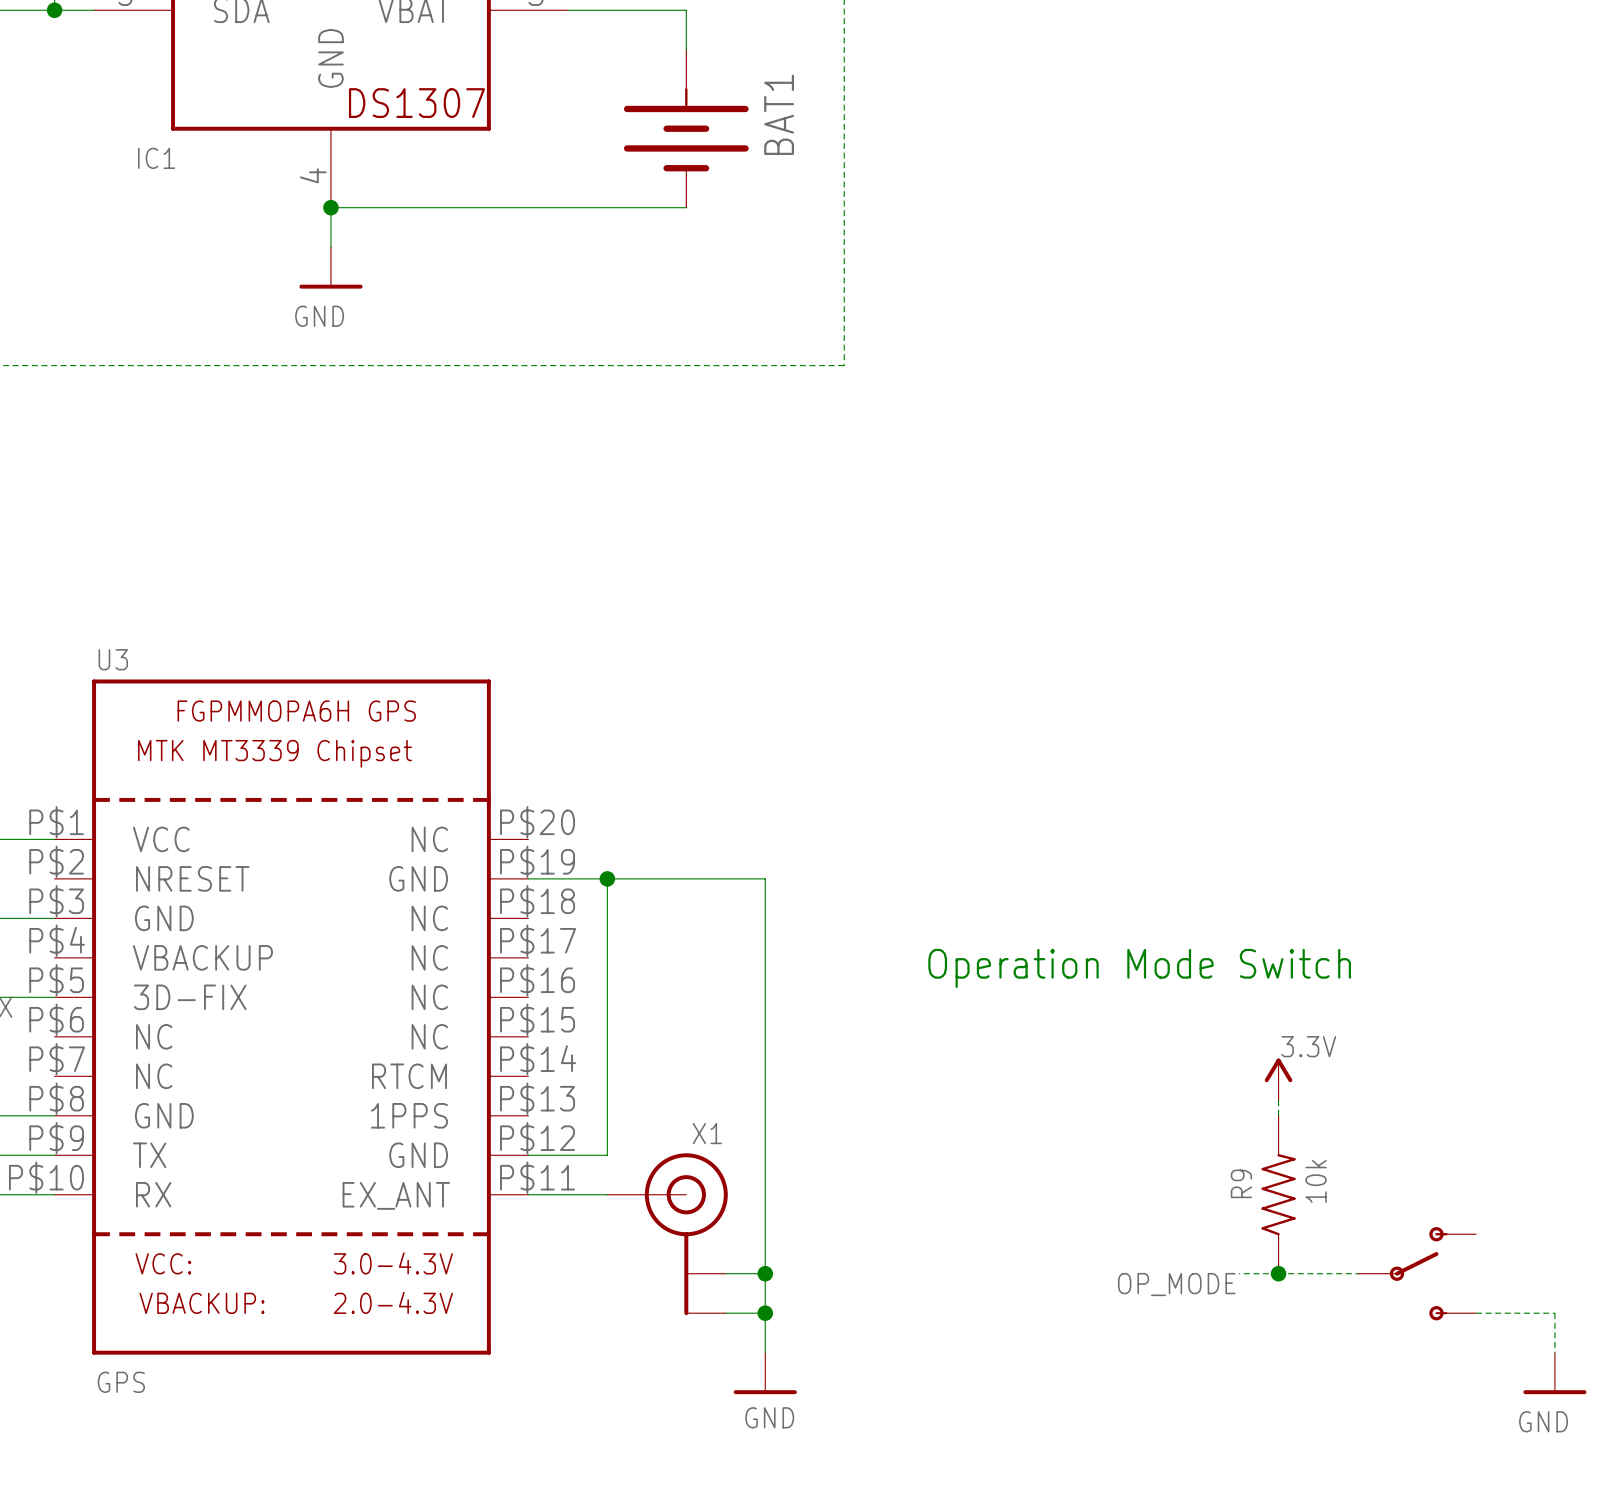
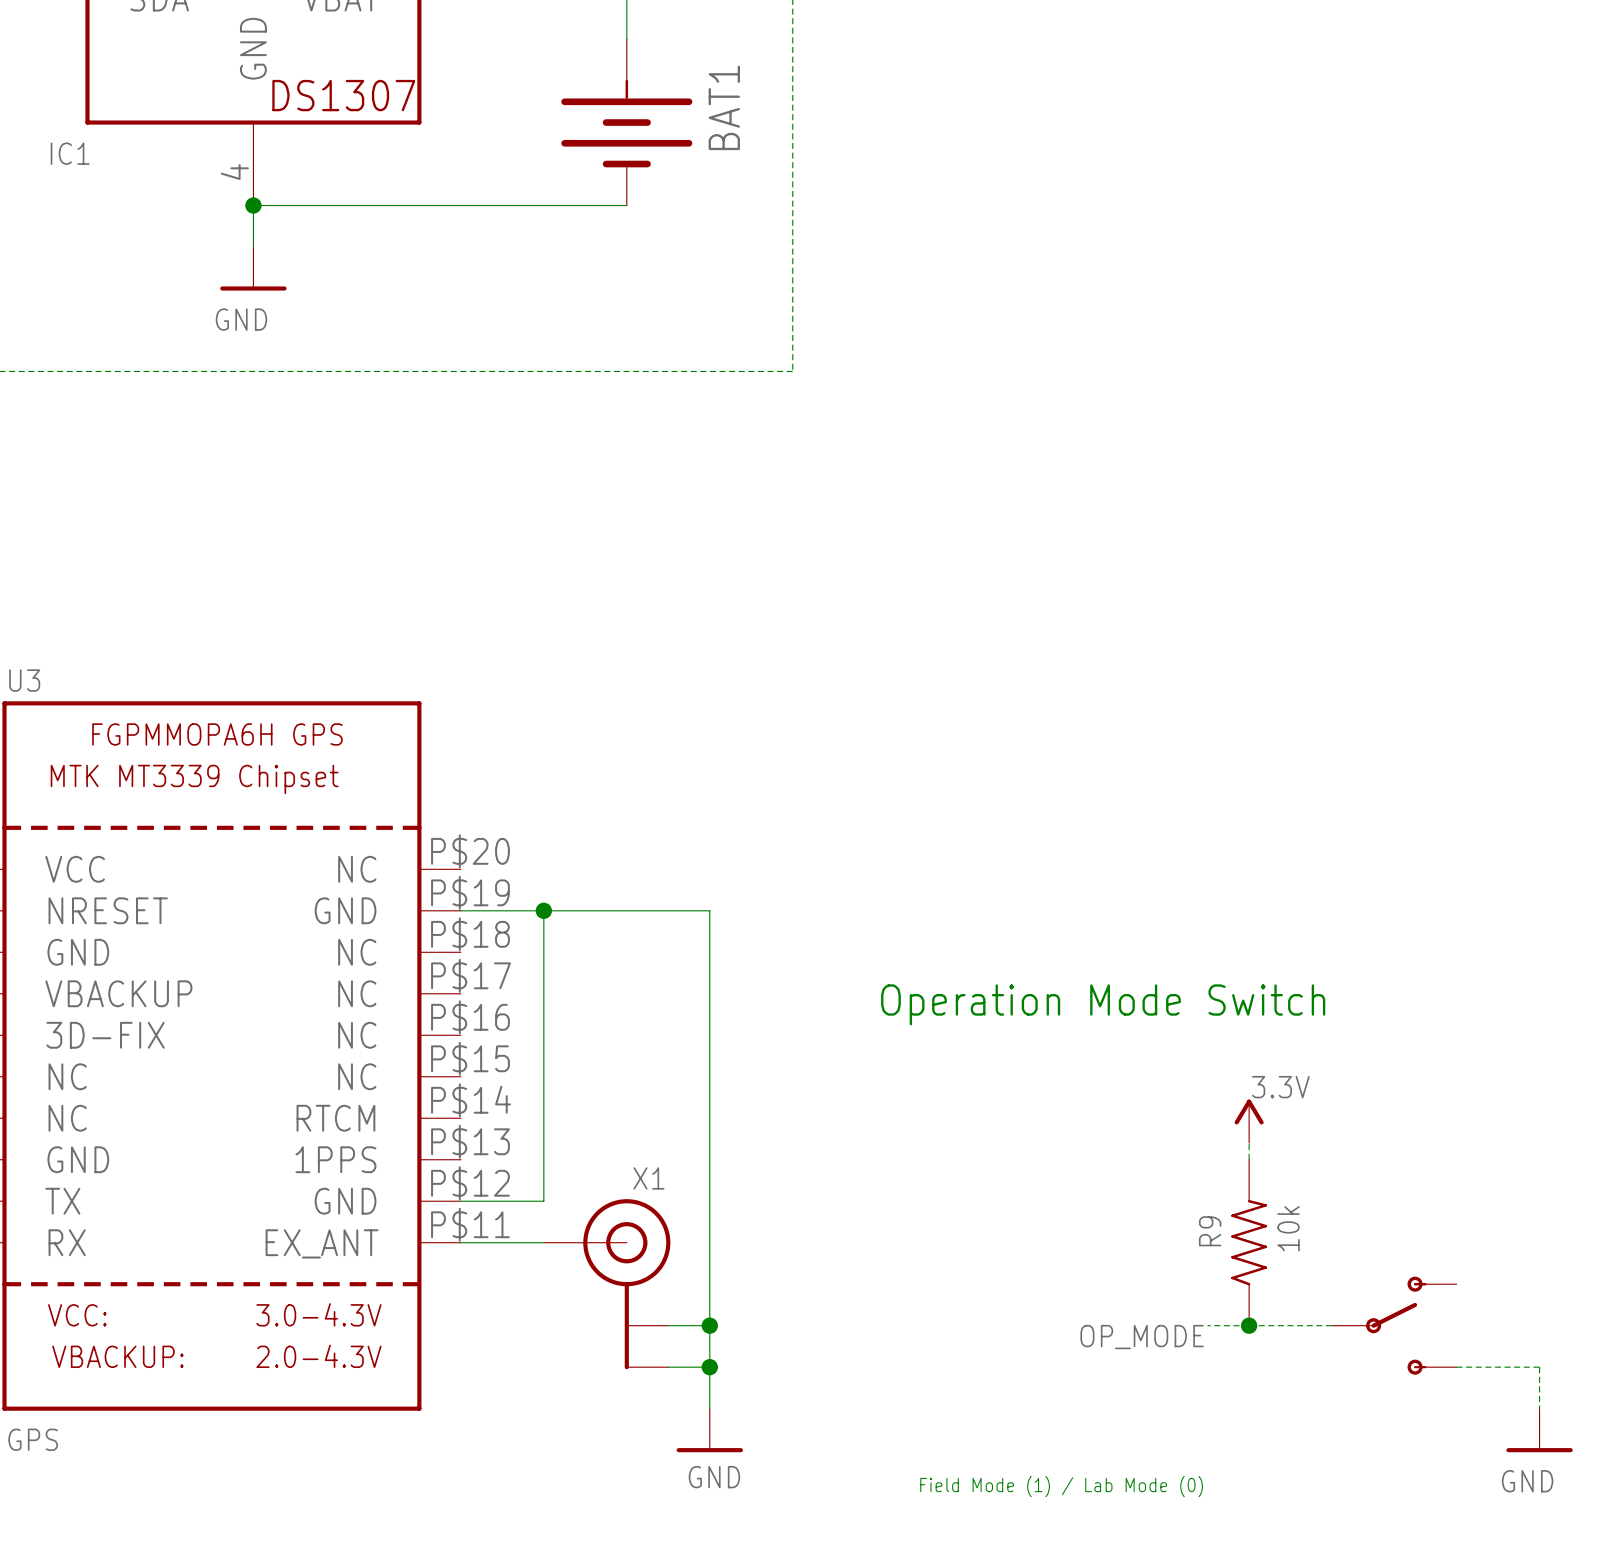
text: none -> Field Mode (1) / Lab Mode (0) (1061, 1486)

